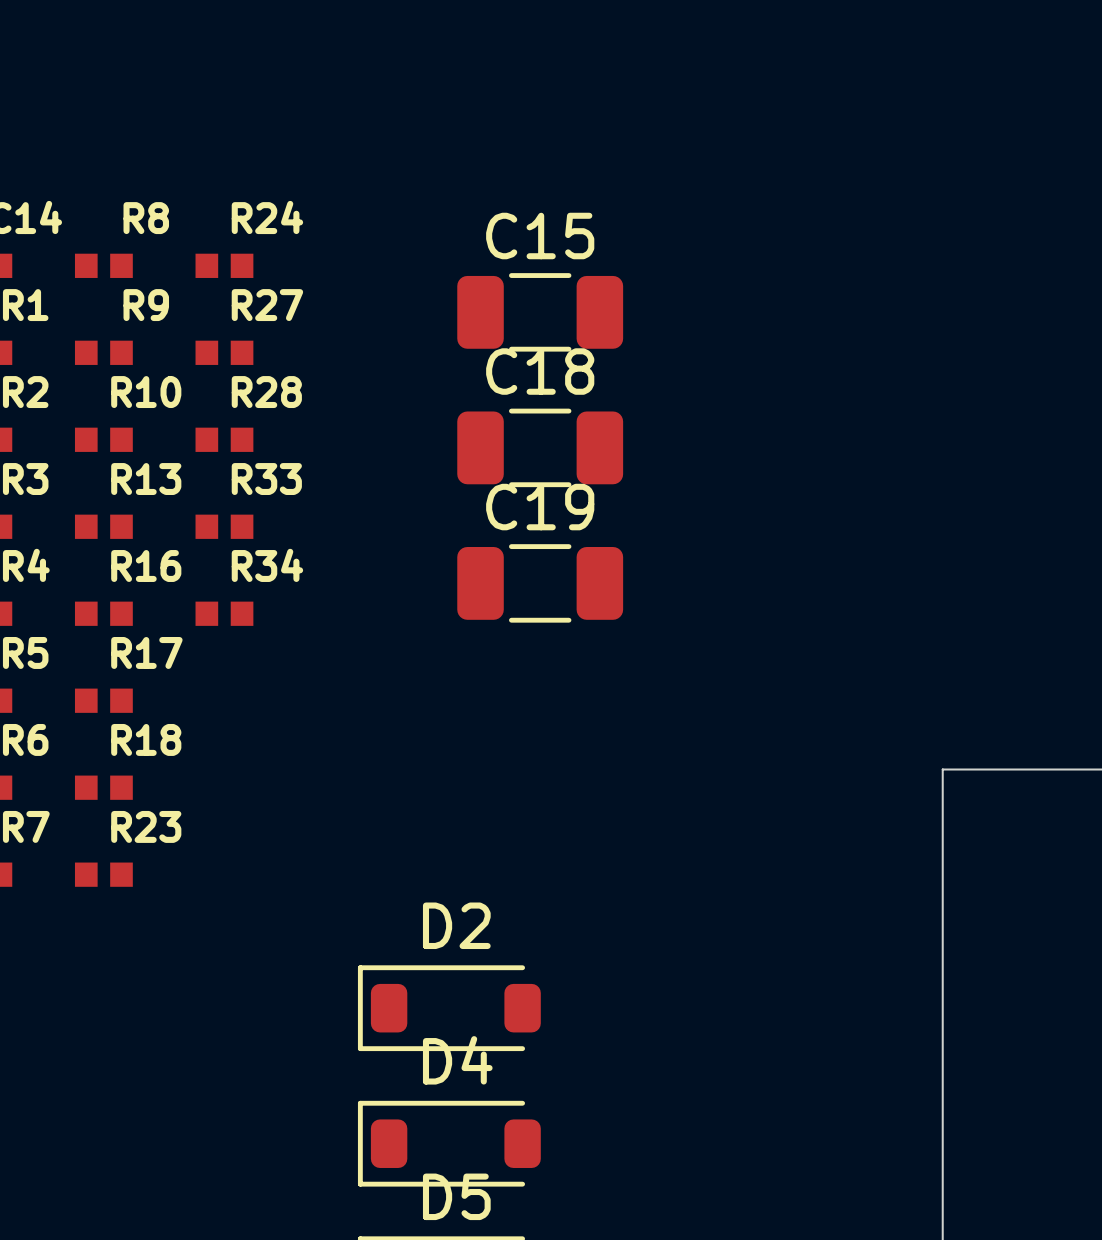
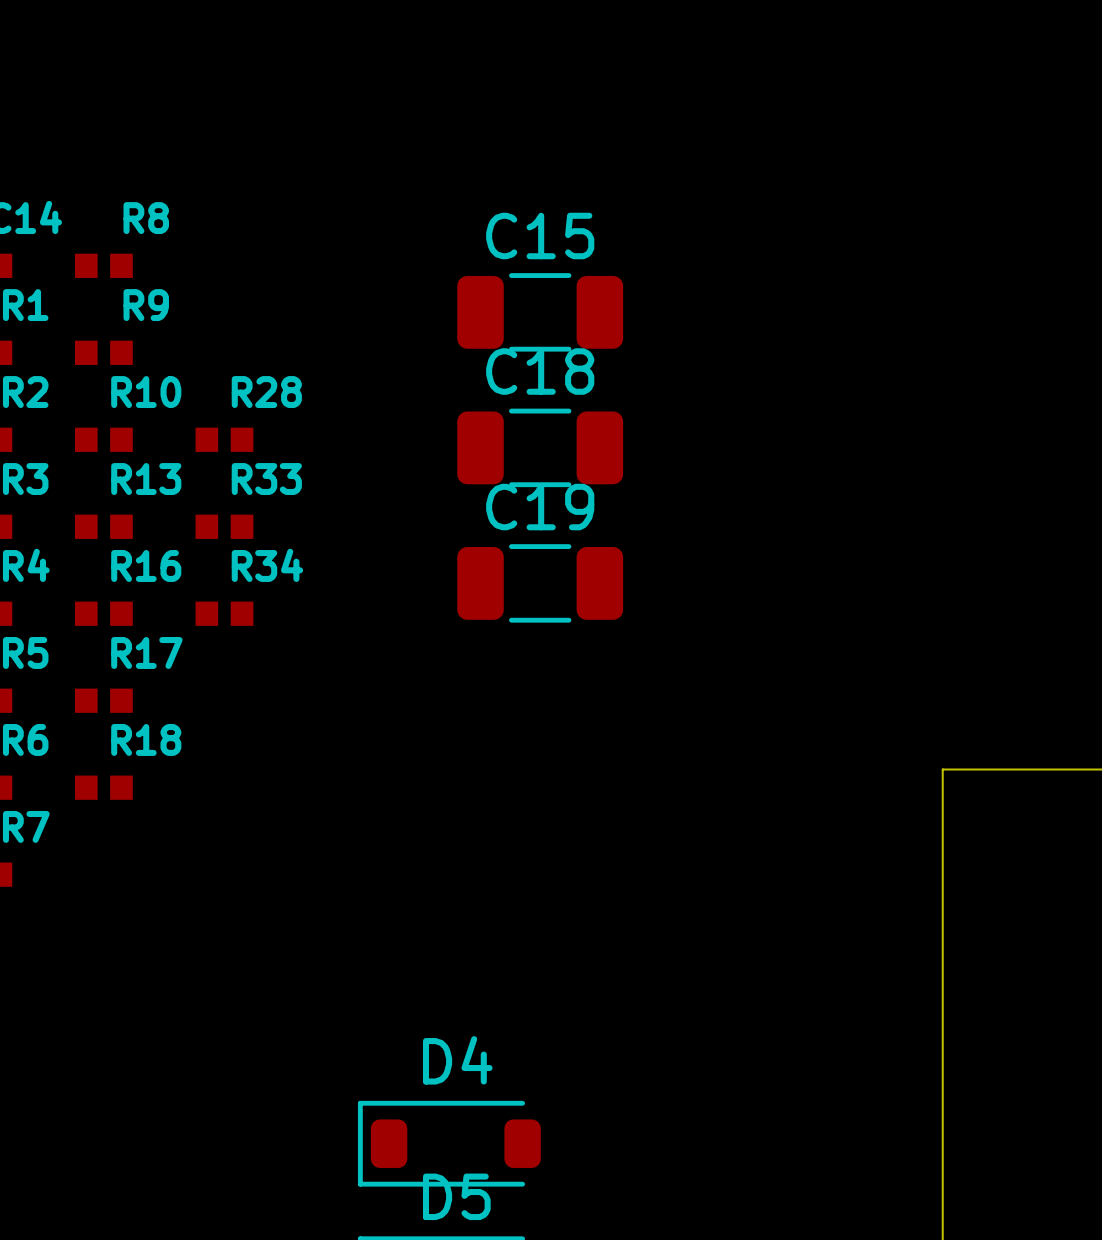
R24: (224, 265) -> none
R27: (224, 352) -> none
R23: (103, 874) -> none
D2: (449, 1008) -> none

